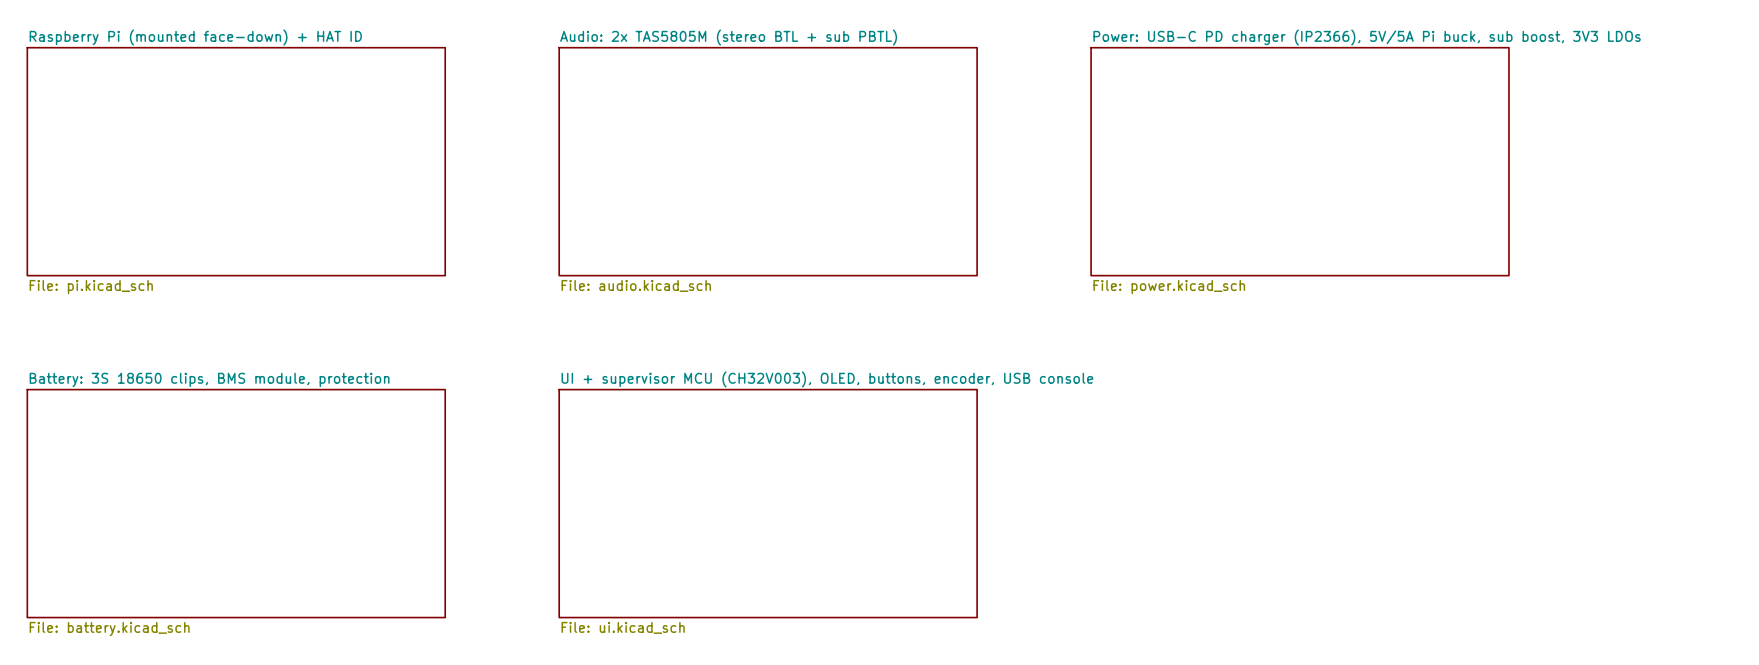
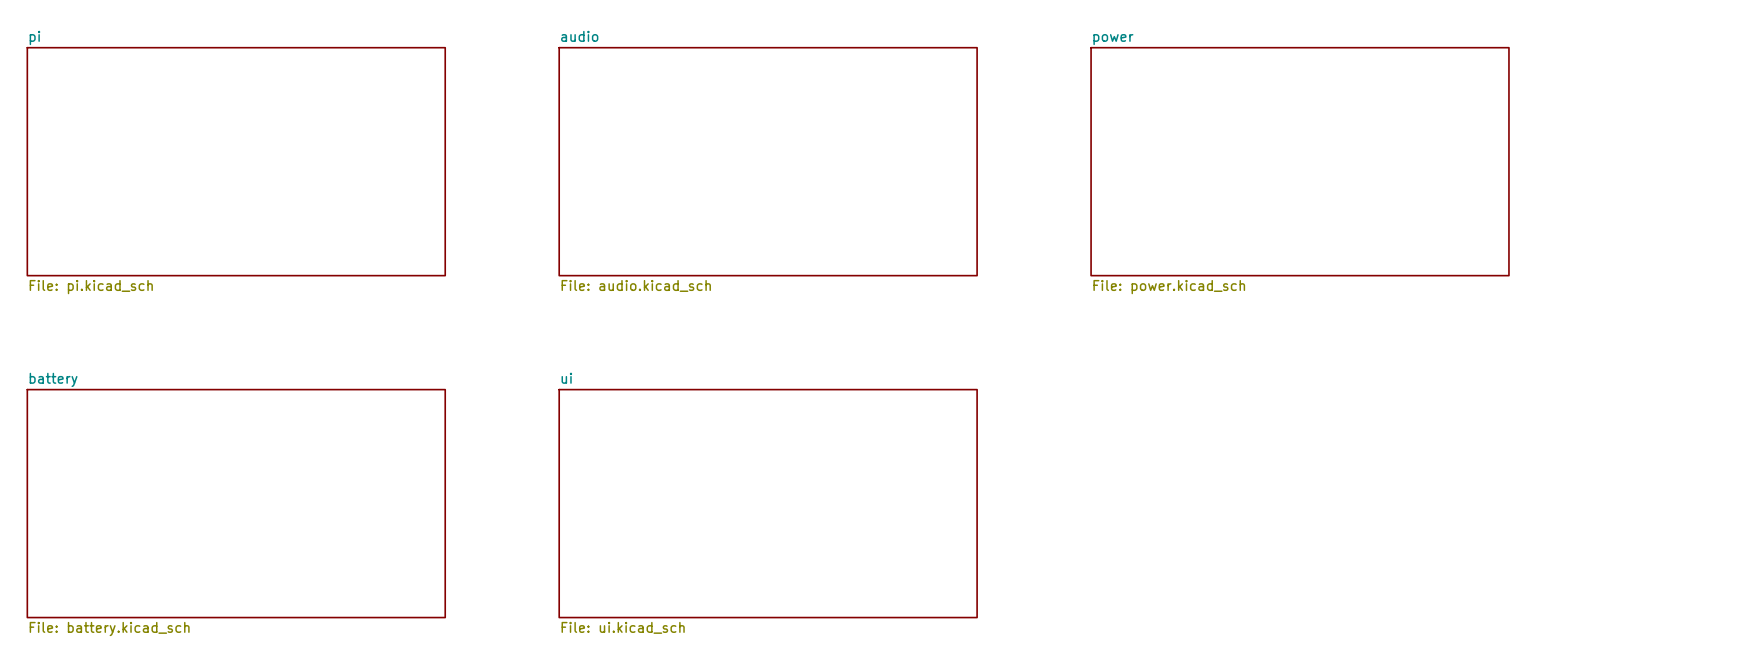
sheet Raspberry Pi (mounted face-down) + HAT ID name: Raspberry Pi (mounted face-down) + HAT ID (195, 37) -> pi (34, 37)
sheet audio name: Audio: 2x TAS5805M (stereo BTL + sub PBTL) (728, 37) -> audio (579, 36)
sheet power name: Power: USB-C PD charger (IP2366), 5V/5A Pi buck, sub boost, 3V3 LDOs (1367, 37) -> power (1113, 39)
sheet battery name: Battery: 3S 18650 clips, BMS module, protection (209, 379) -> battery (53, 379)
sheet UI + supervisor MCU (CH32V003), OLED, buttons, encoder, USB console name: UI + supervisor MCU (CH32V003), OLED, buttons, encoder, USB console (827, 379) -> ui (566, 378)

